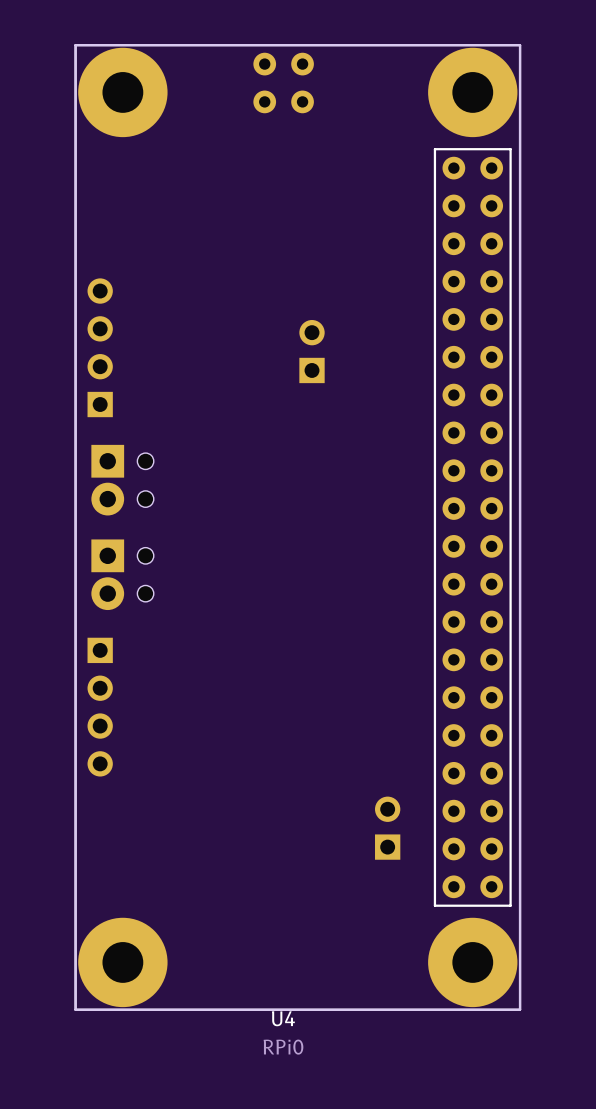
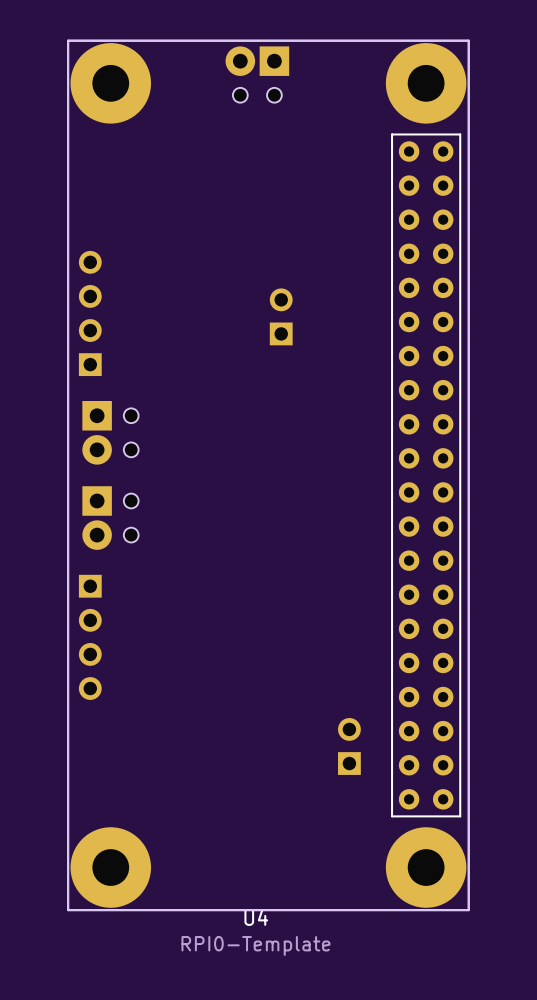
part footprint: [253, 52, 314, 114] -> [225, 46, 290, 103]
U4 value: RPi0 (283, 1047) -> RPI0-Template (255, 945)

